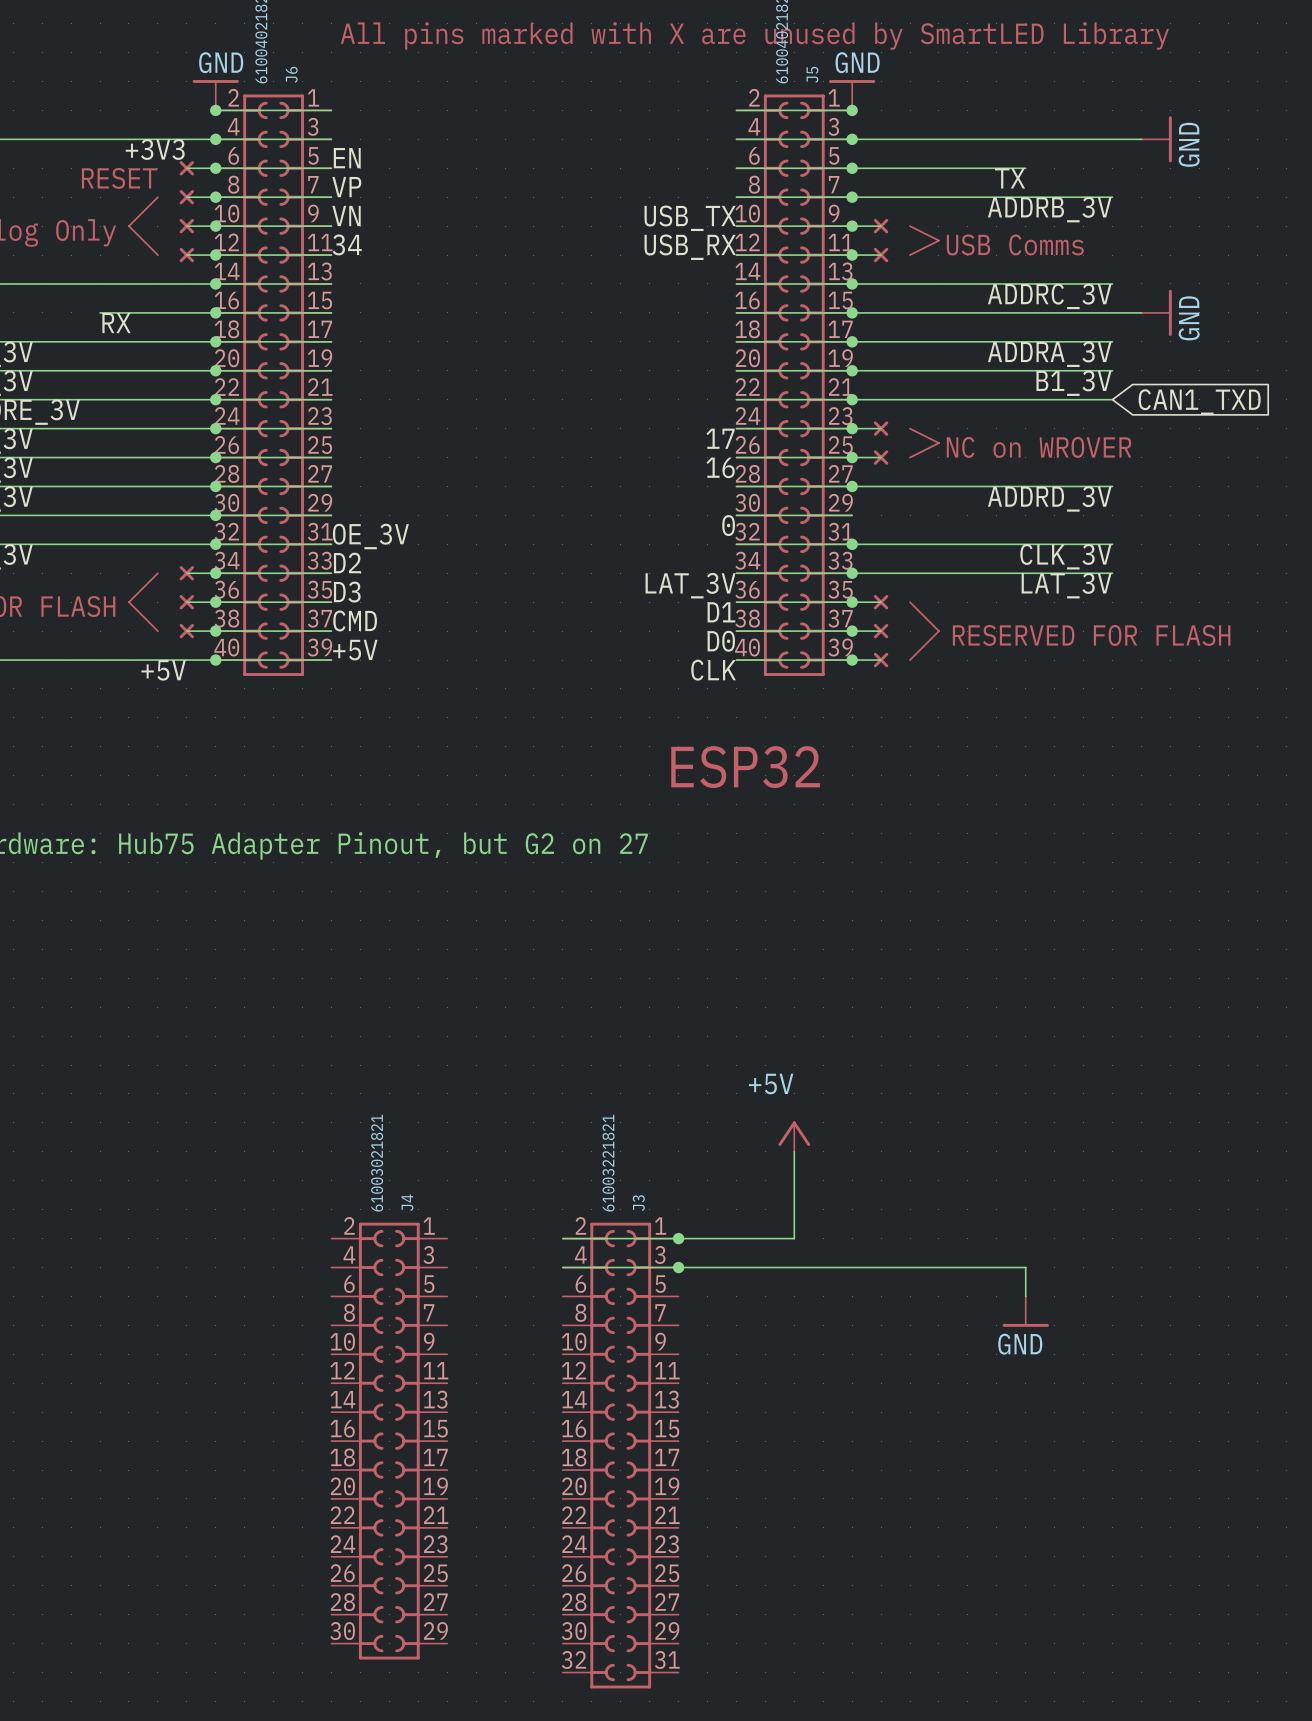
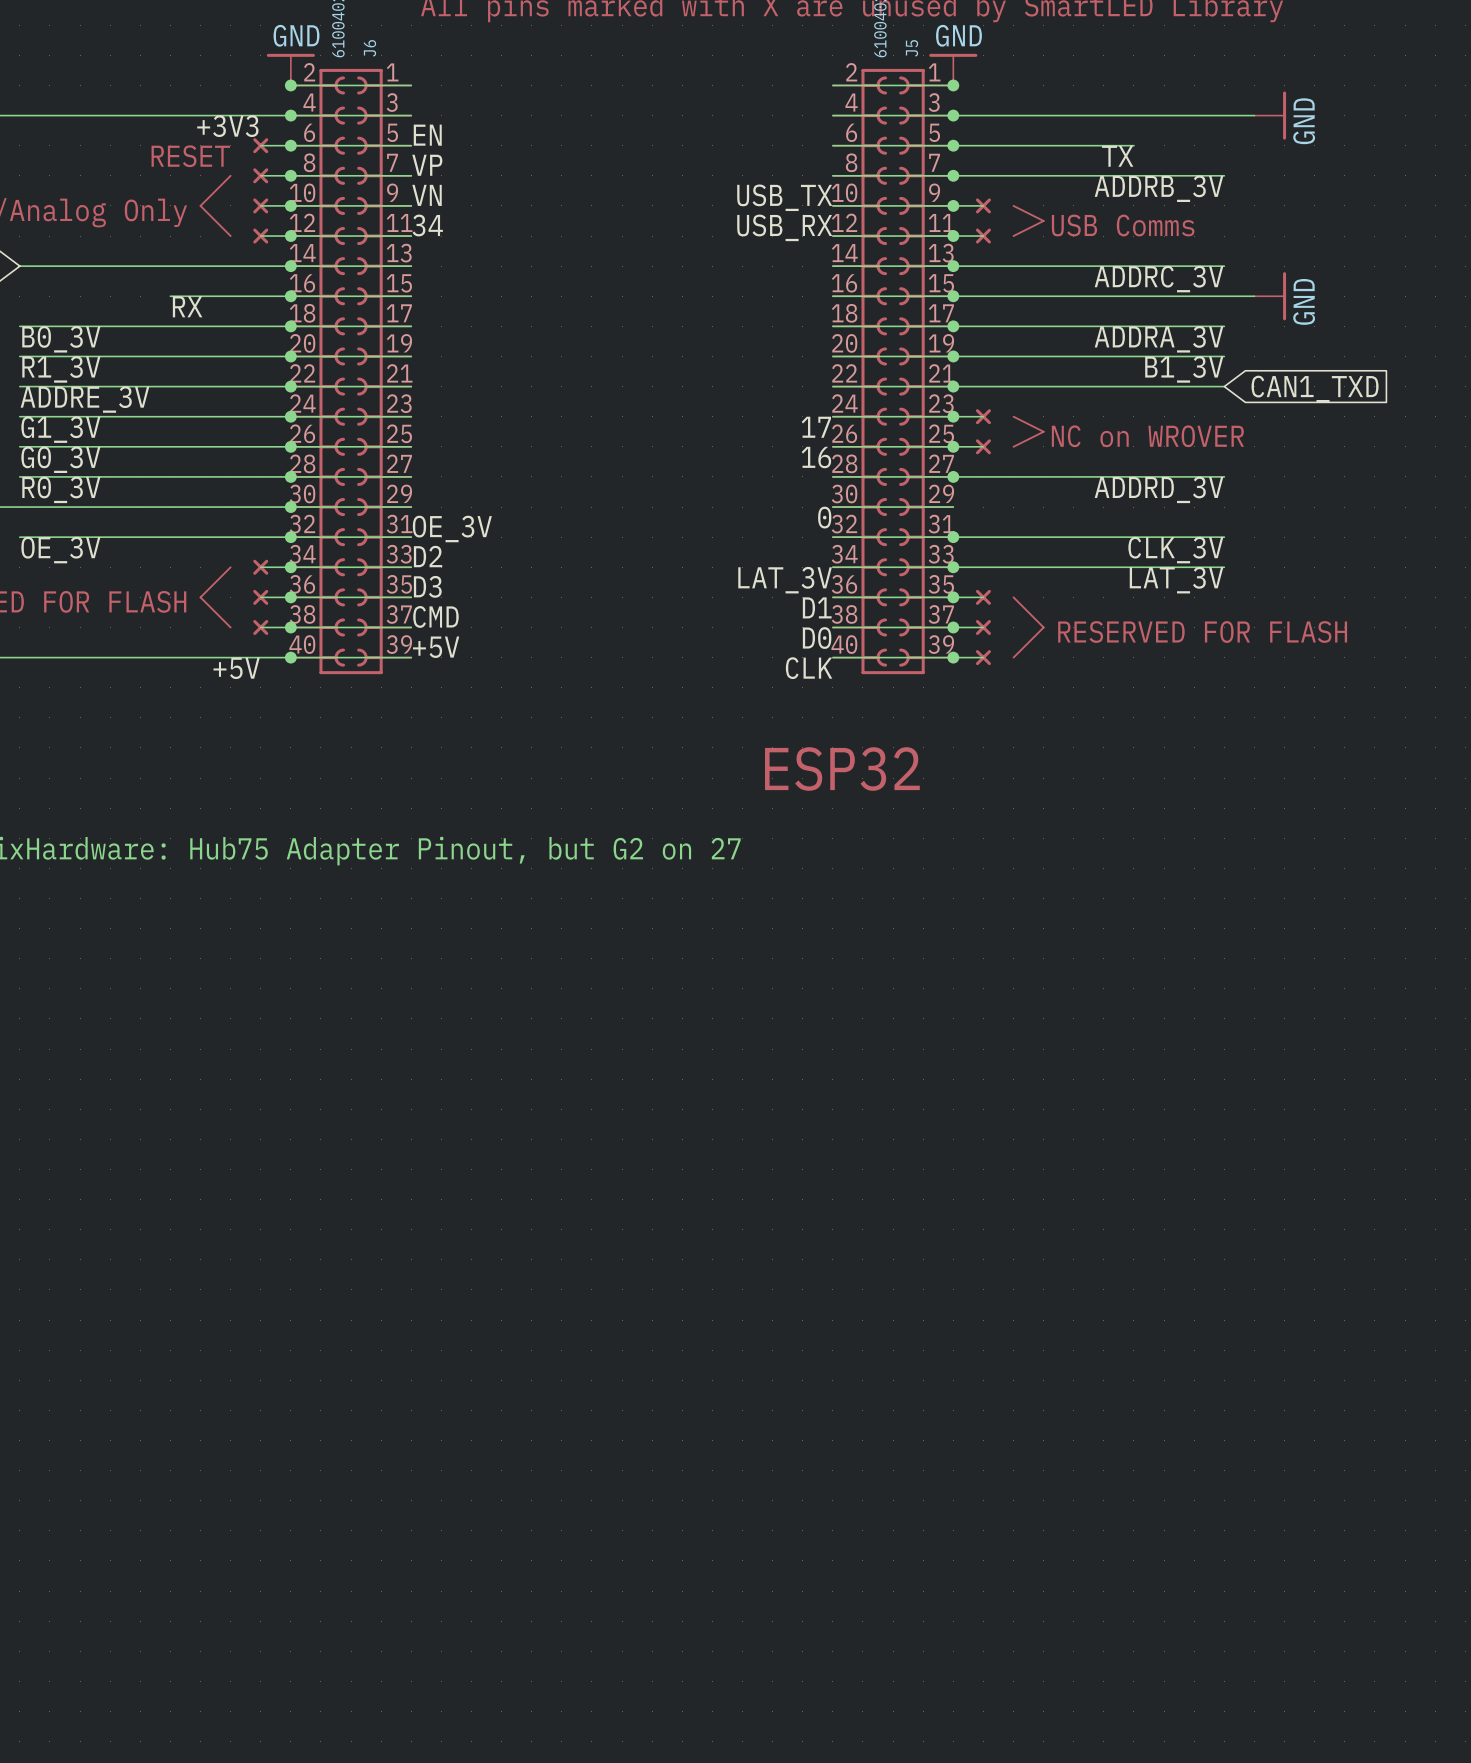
power symbol: +5V (794, 1136) -> none
wire: (794, 1151) (794, 1238) (562, 1238) -> none
junction: (678, 1238) -> none
wire: (562, 1267) (1025, 1267) (1025, 1296) -> none
junction: (678, 1267) -> none
power symbol: GND (1025, 1311) -> none
J4: 61003021821 (389, 1441) -> none
J3: 61003221821 (620, 1455) -> none

